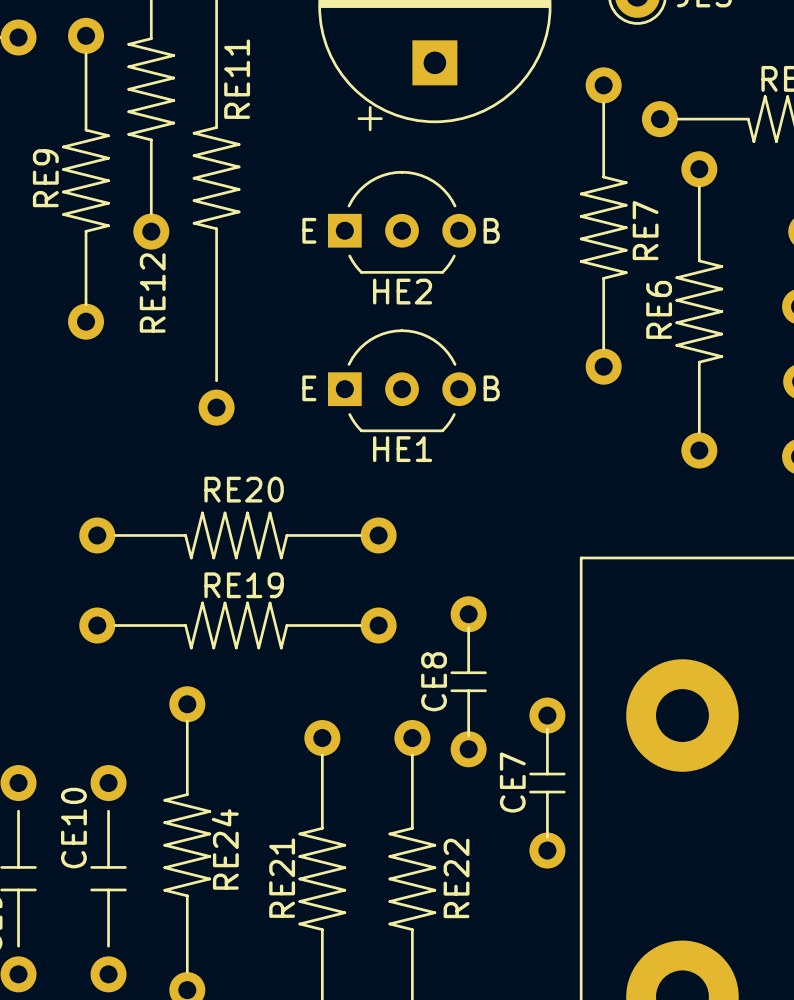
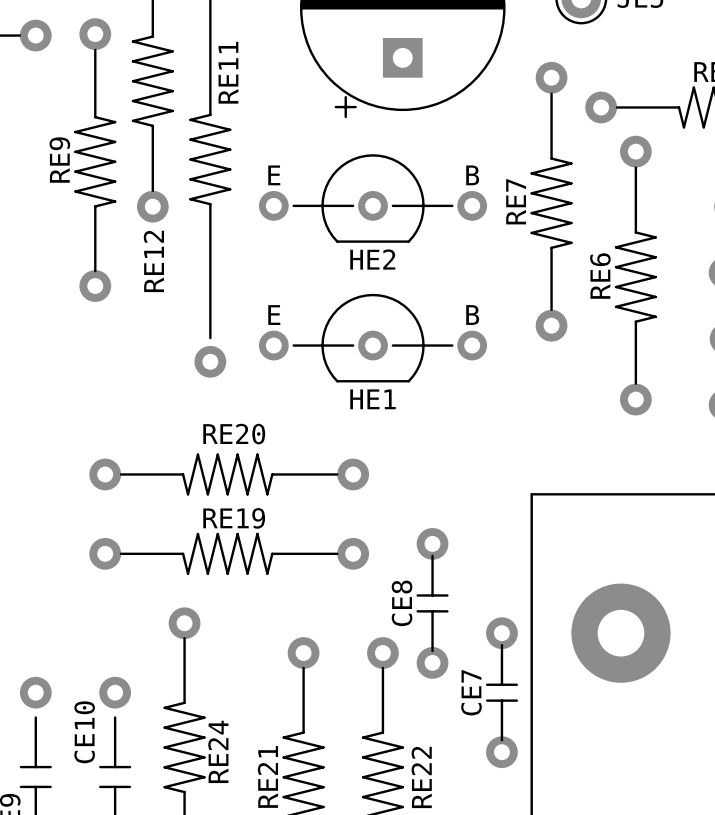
HE2 footprint: [327, 170, 477, 274] -> [258, 154, 488, 243]
RE7 name position: RE7 (645, 230) -> RE7 (516, 201)
HE1 footprint: [327, 329, 477, 433] -> [258, 293, 488, 383]

